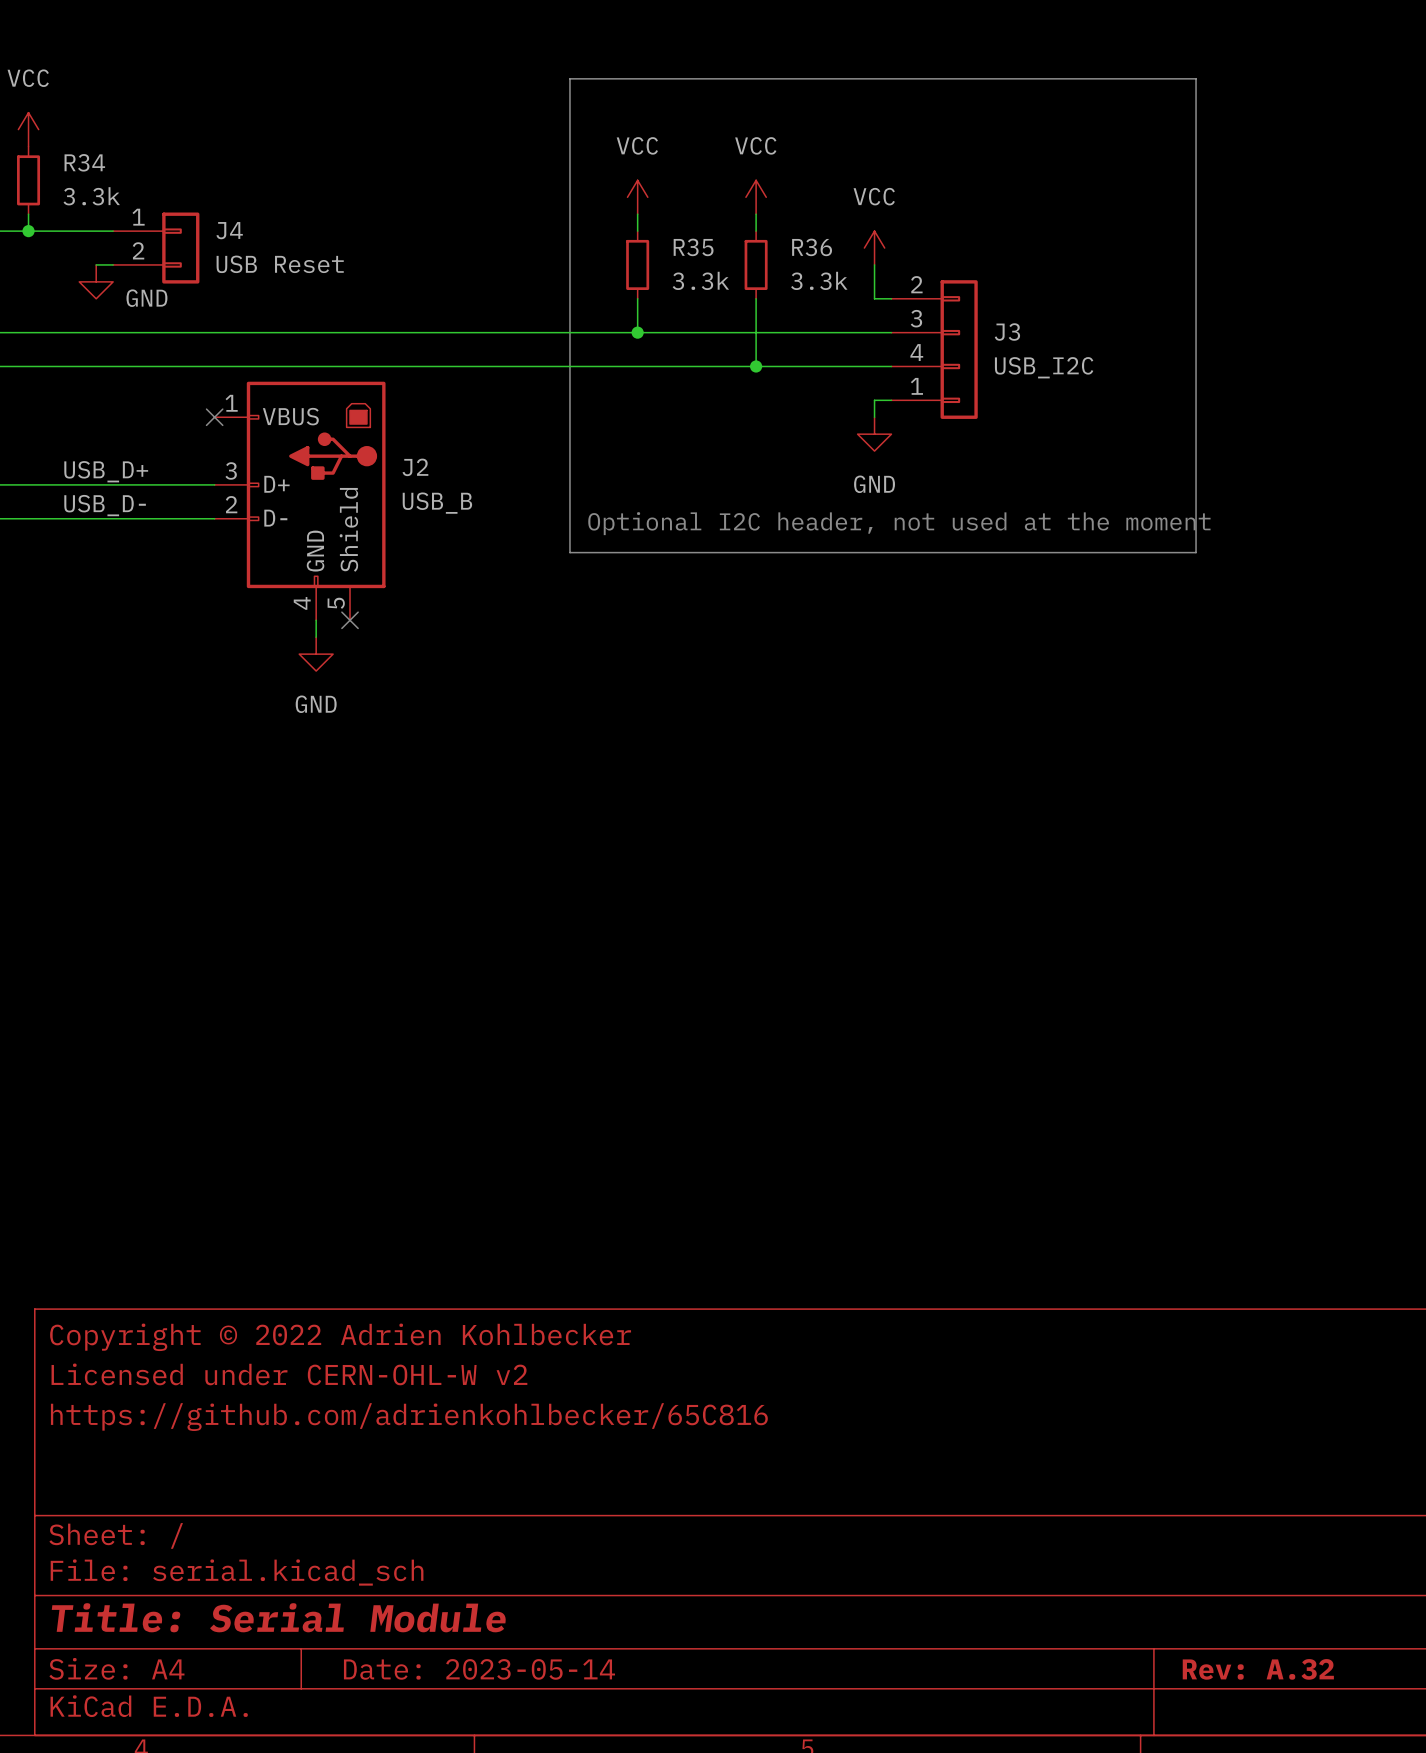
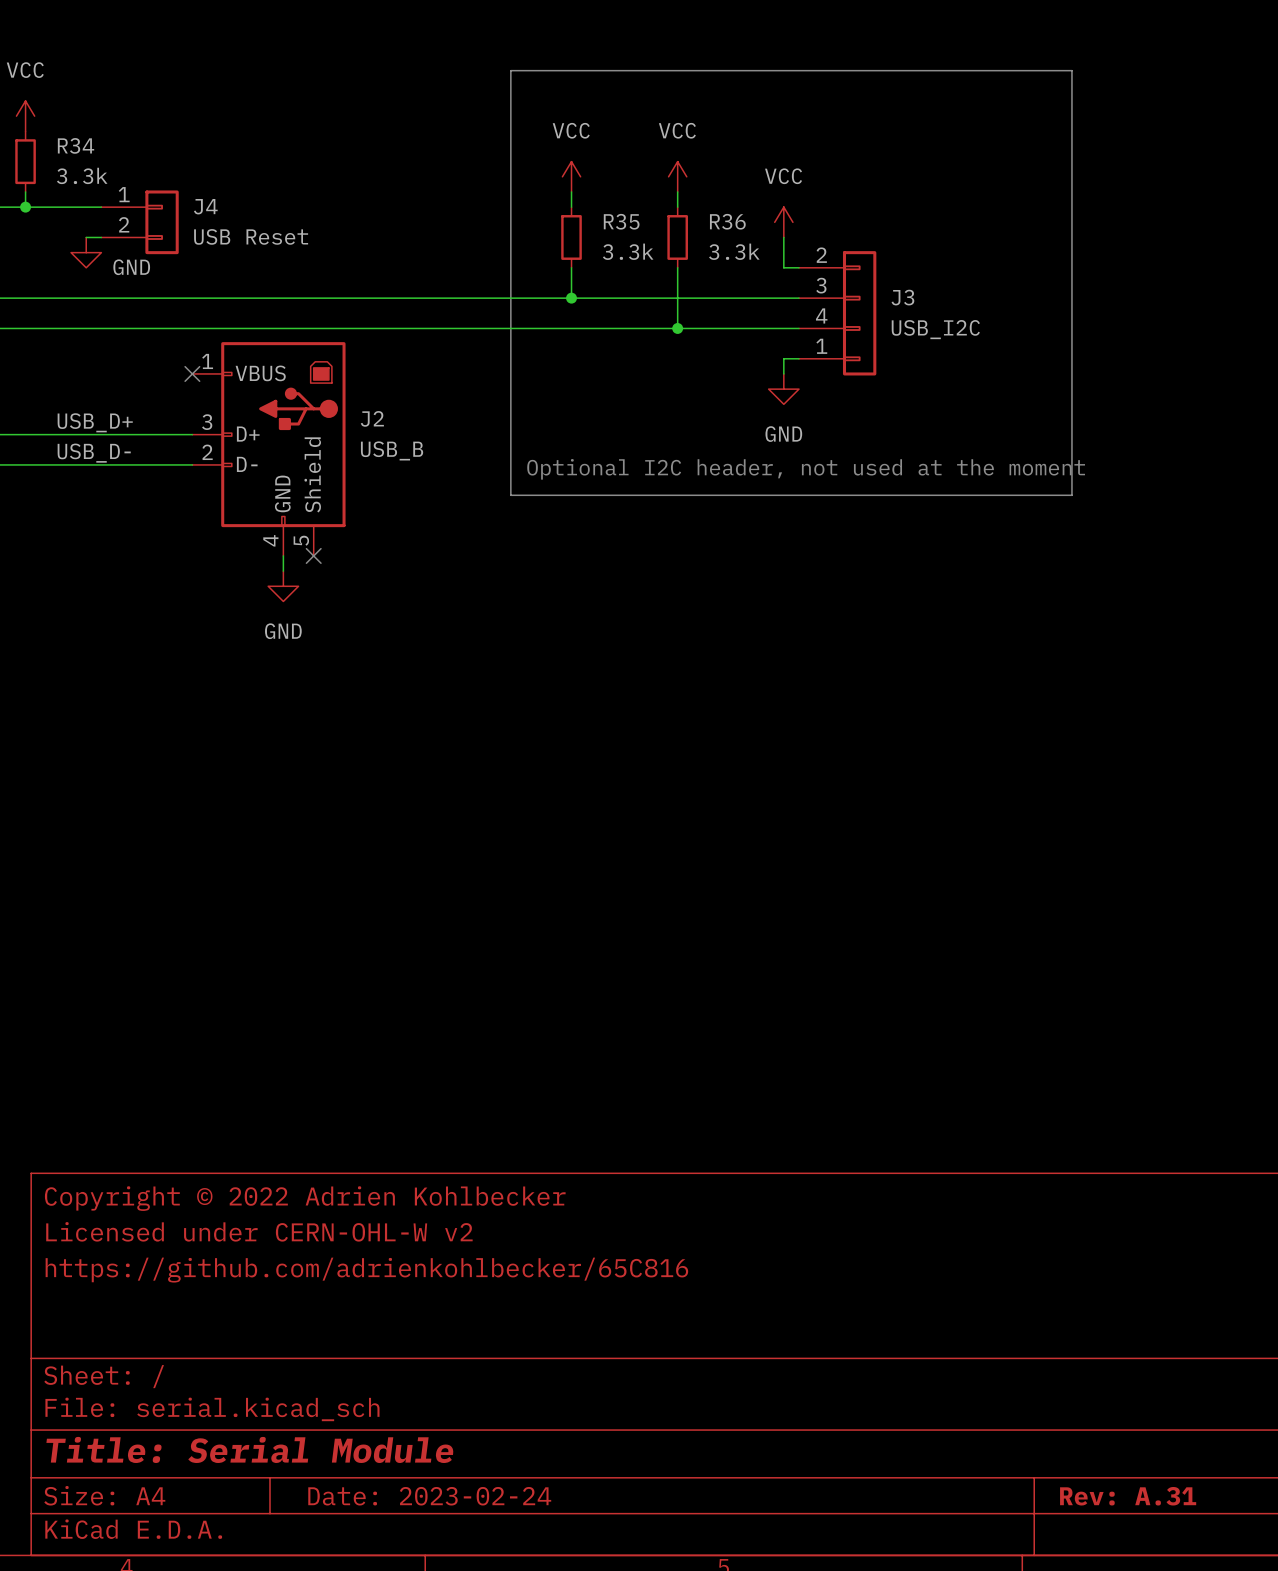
title block: Date: 2023-05-14 (479, 1669) -> Date: 2023-02-24 (429, 1496)
title block: Rev: A.32 (1258, 1669) -> Rev: A.31 (1128, 1496)

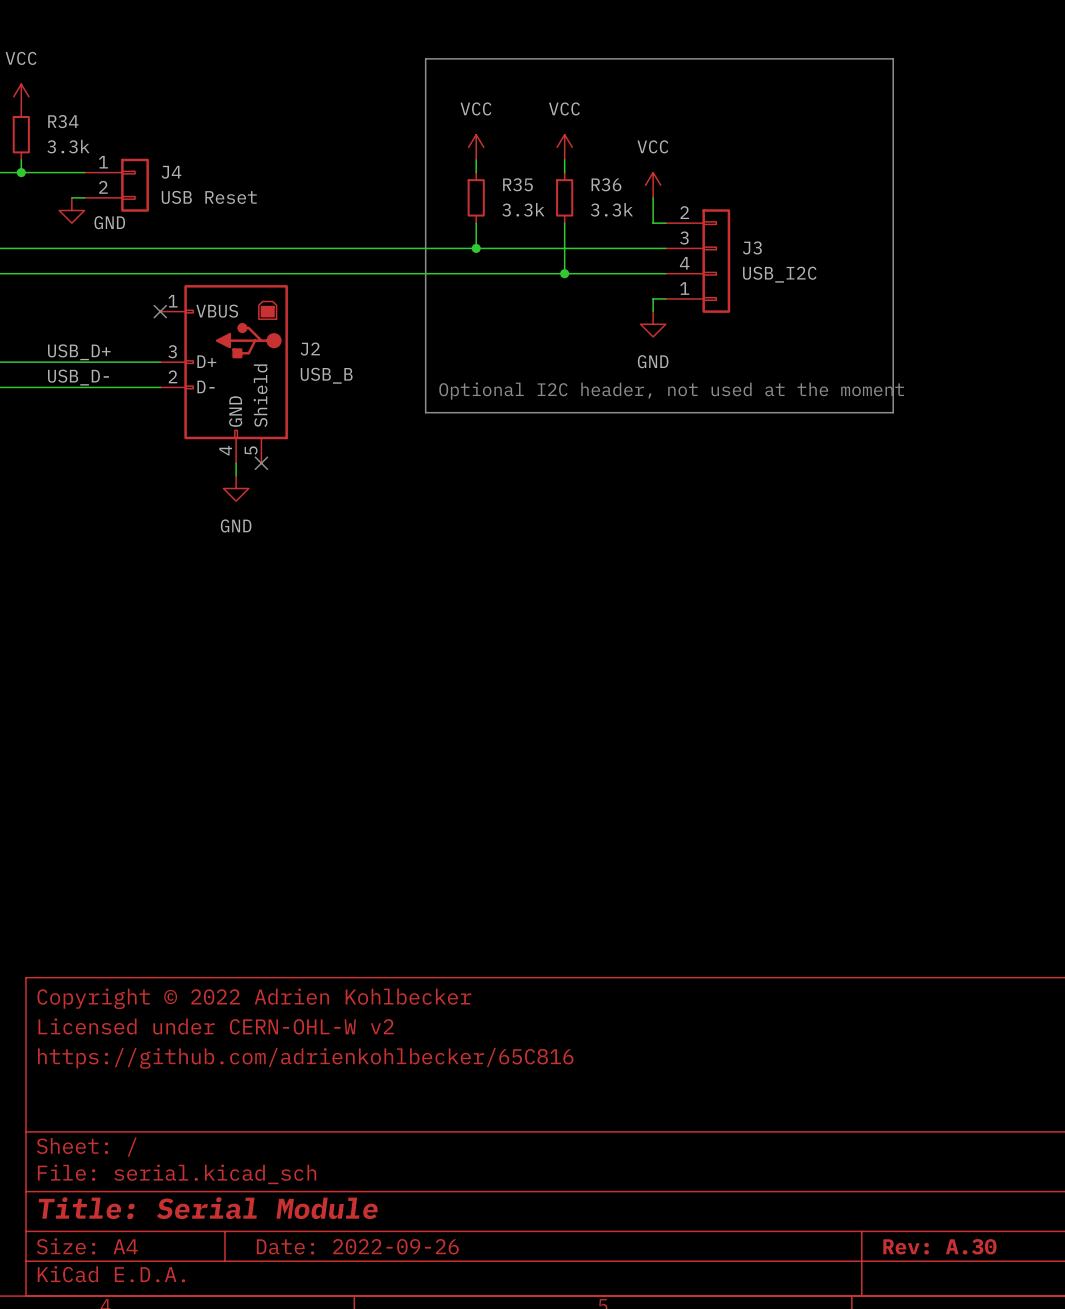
title block: Date: 2023-02-24 (429, 1496) -> Date: 2022-09-26 (357, 1246)
title block: Rev: A.31 (1128, 1496) -> Rev: A.30 (939, 1246)

